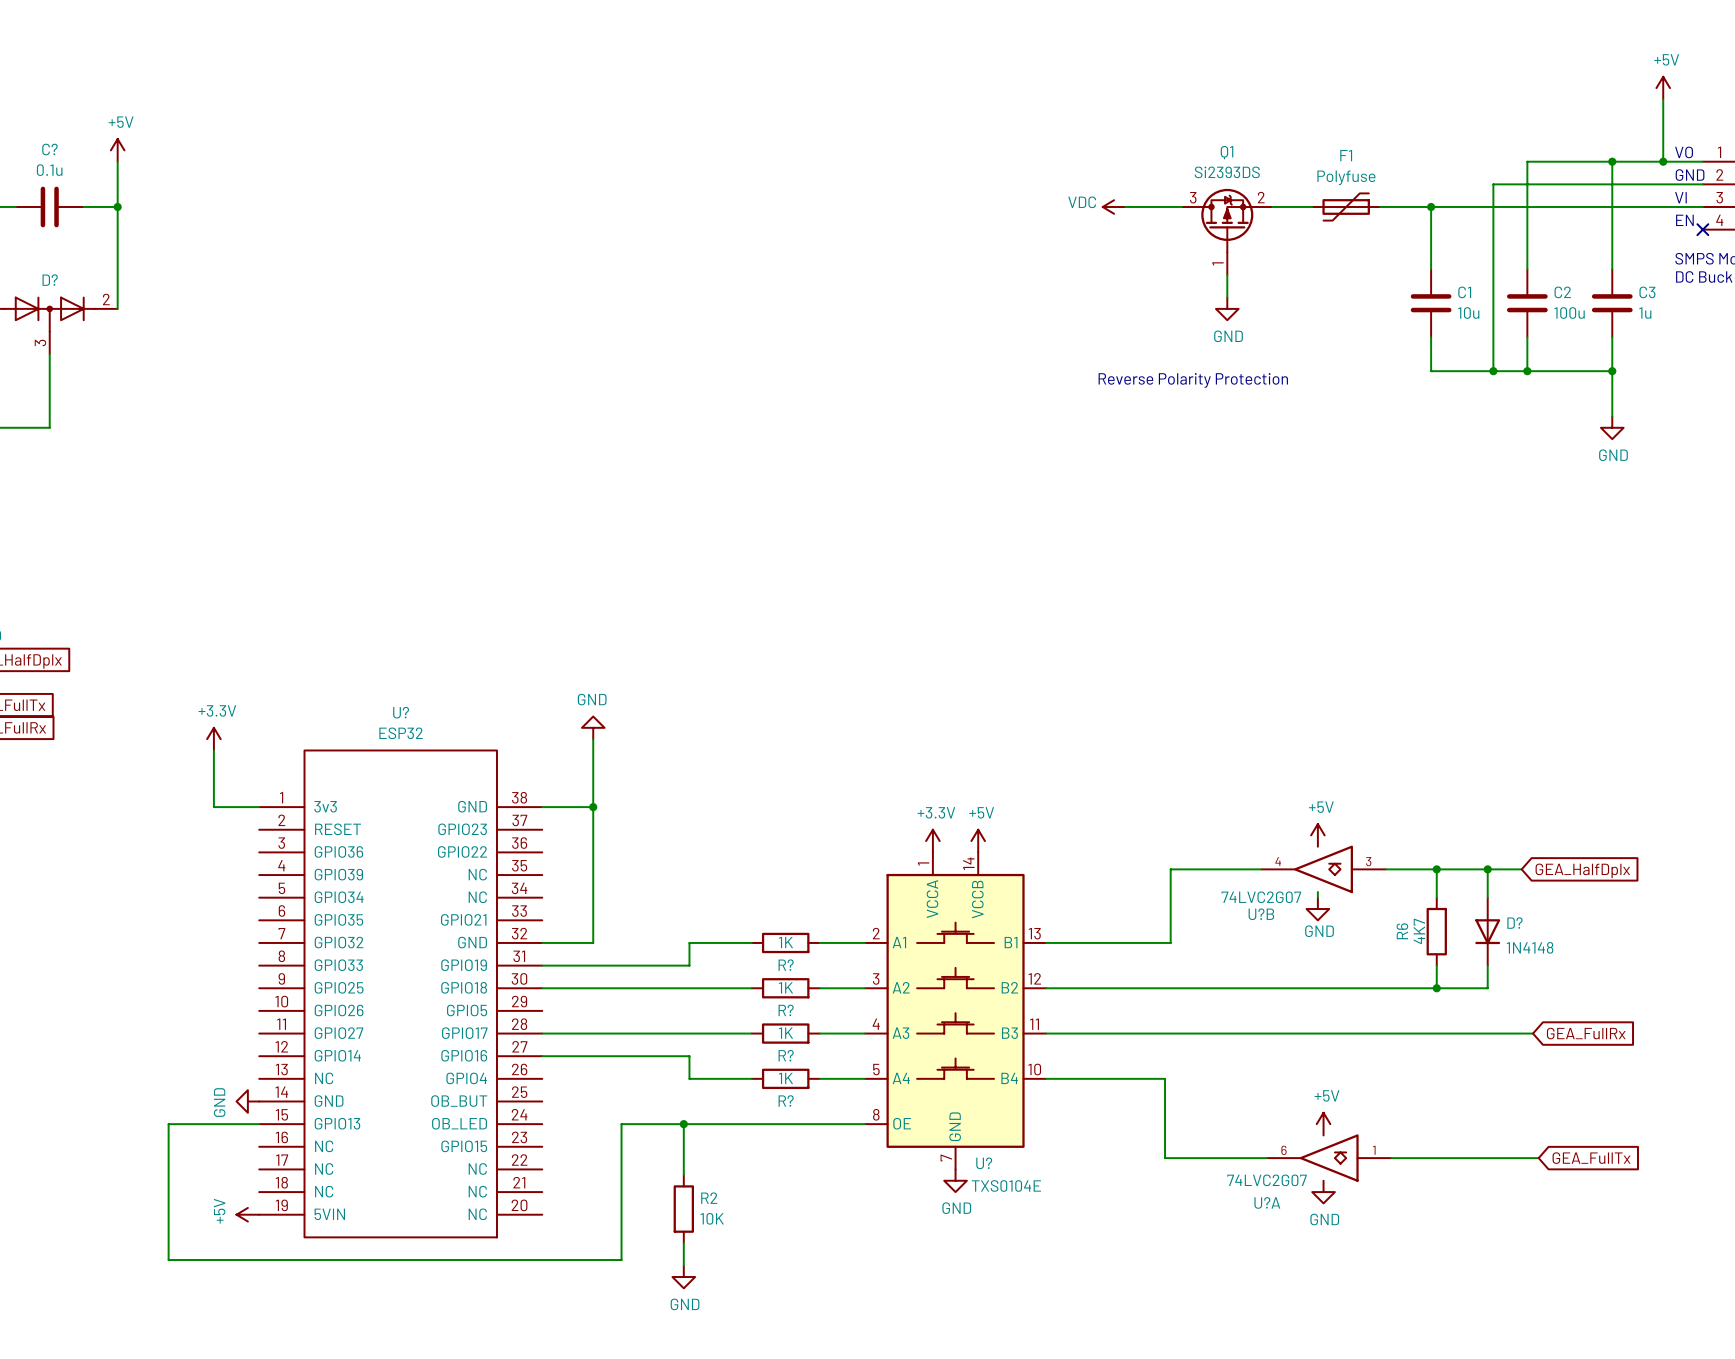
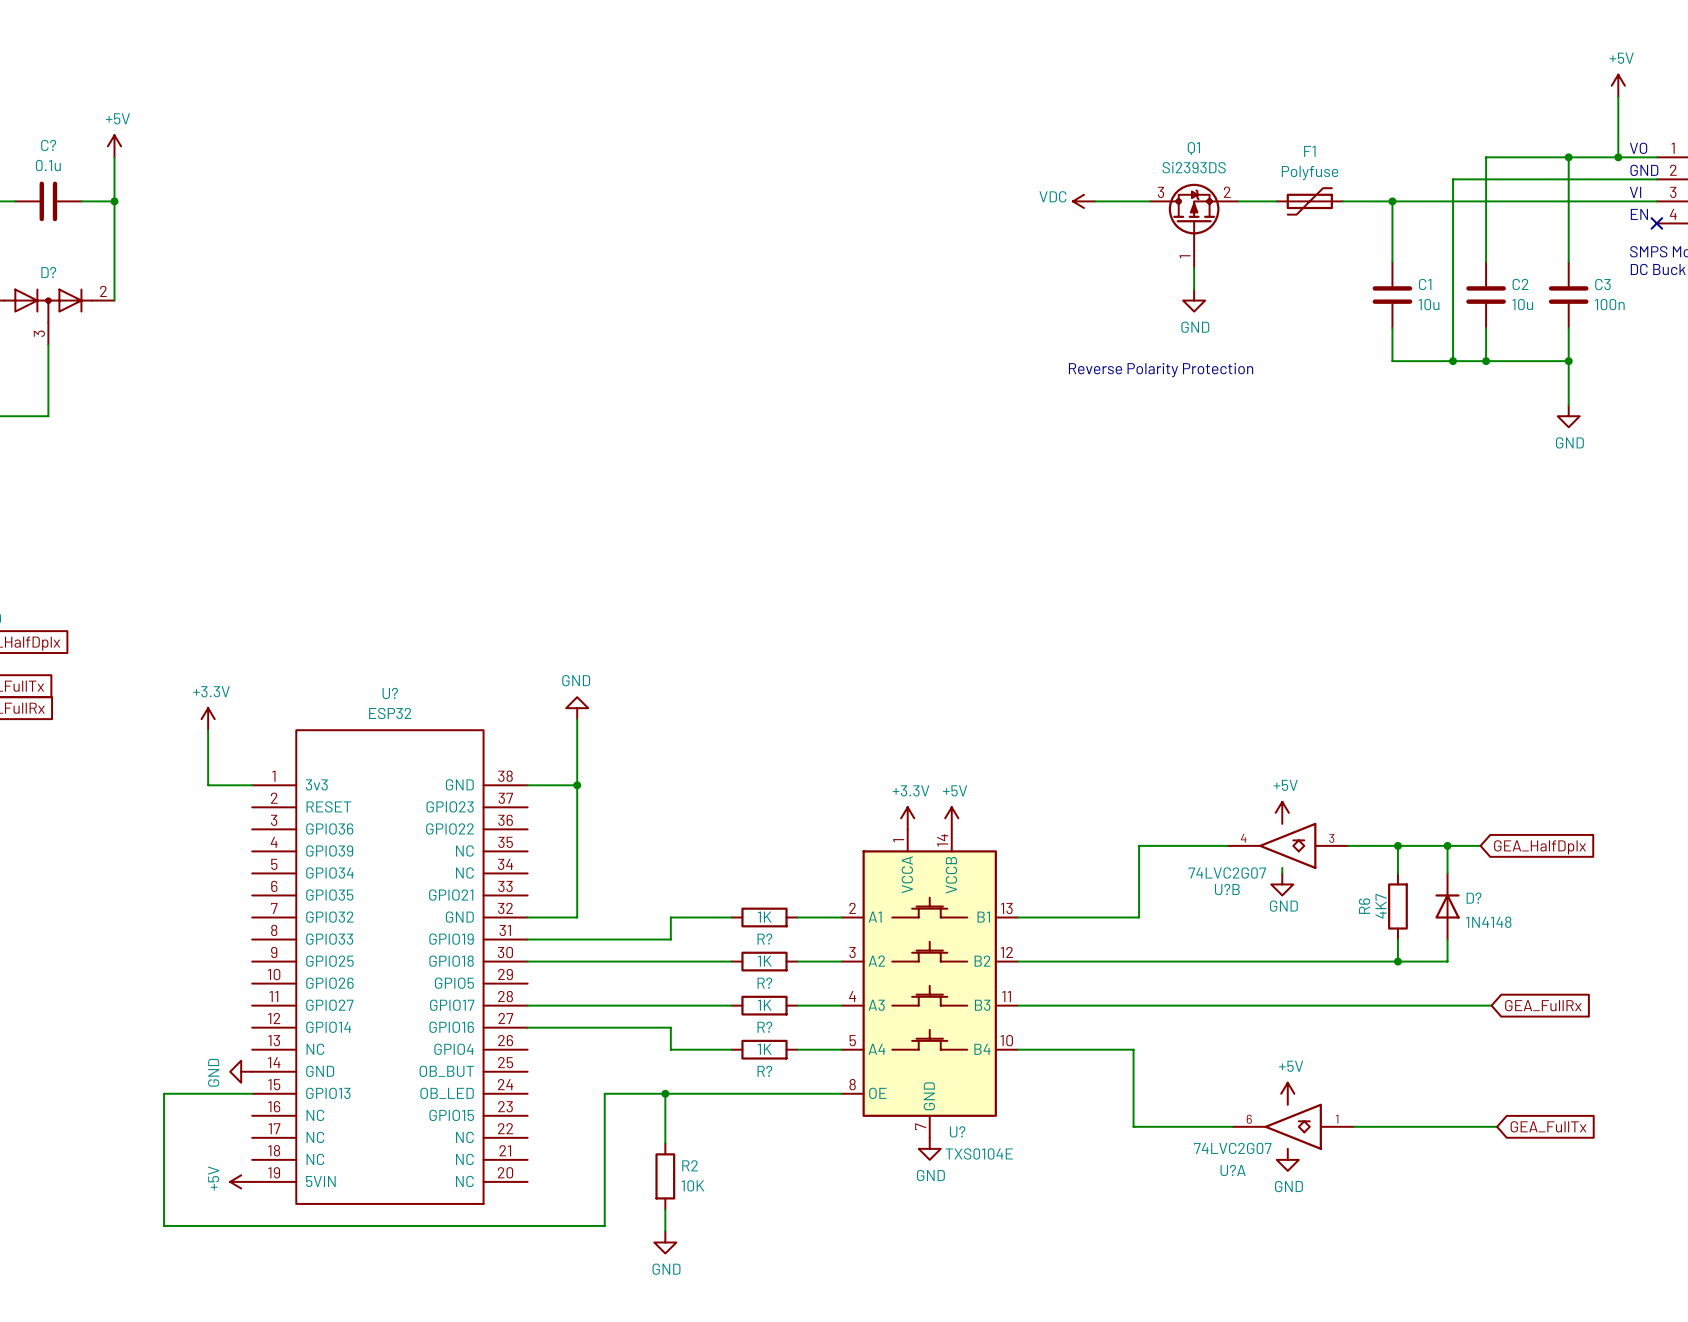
C2 value: 100u (1569, 313) -> 10u (1522, 304)
C3 value: 1u (1645, 313) -> 100n (1609, 304)
D? rotation: 0° (1487, 931) -> 180° (1447, 906)

